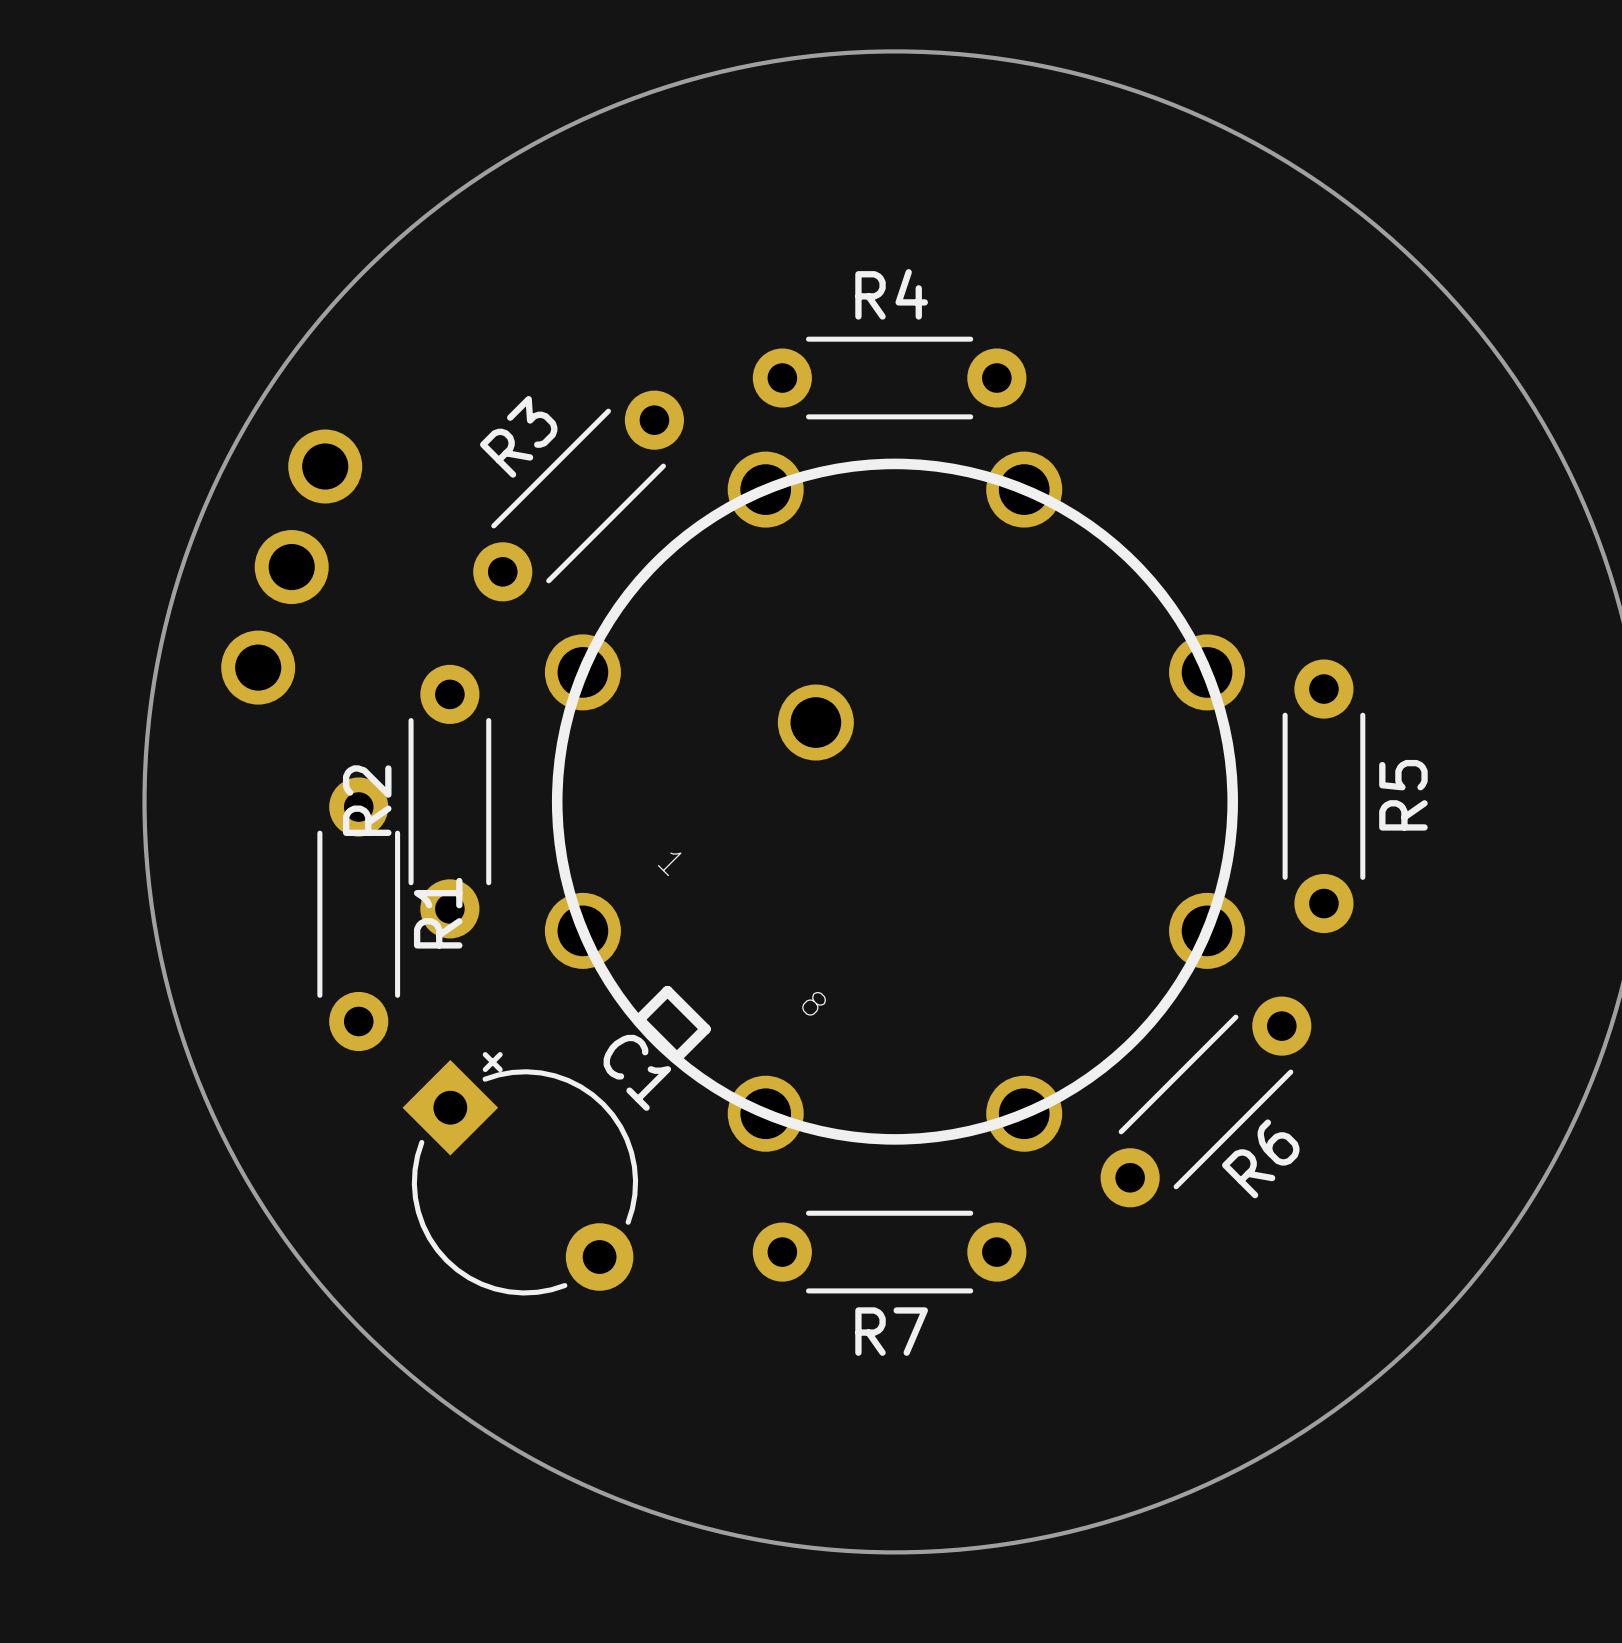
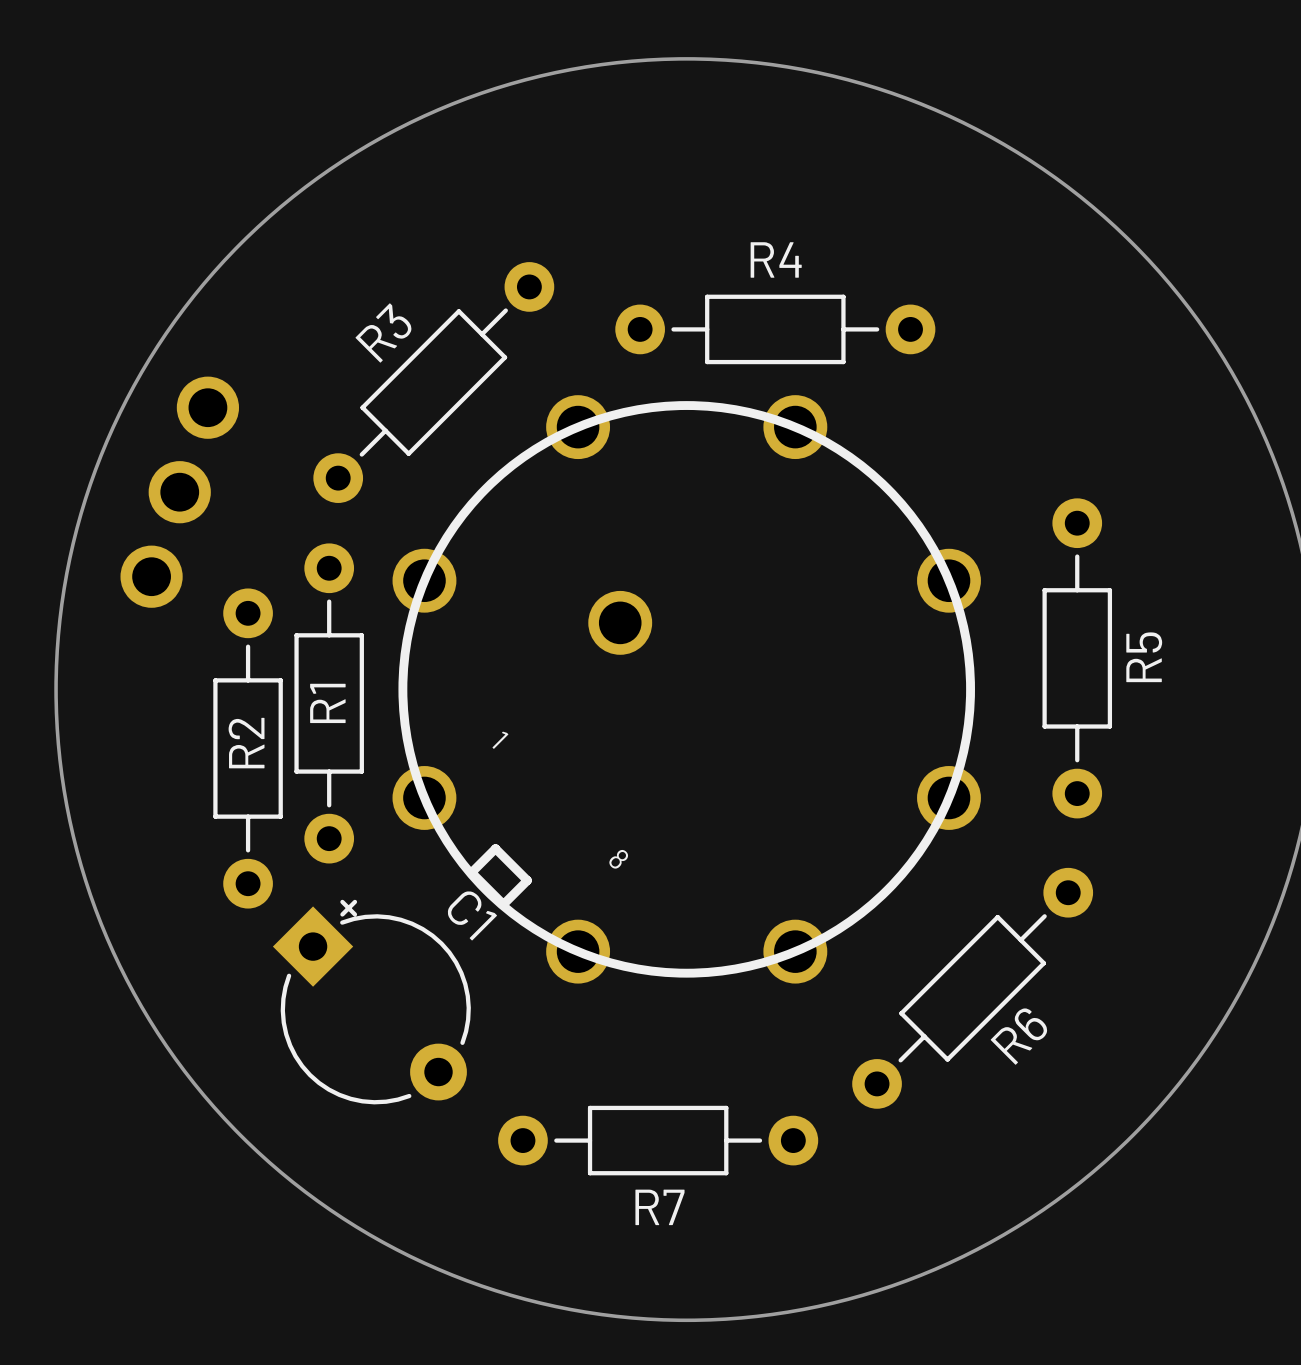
R4 footprint: [752, 336, 1027, 420] -> [615, 294, 936, 365]
R3 footprint: [473, 390, 684, 602] -> [313, 262, 555, 503]
R5 footprint: [1282, 659, 1366, 934] -> [1042, 498, 1113, 819]
R2 footprint: [408, 664, 492, 939] -> [294, 543, 364, 864]
R1 footprint: [317, 777, 401, 1052] -> [213, 588, 283, 909]
R6 footprint: [1100, 996, 1312, 1208] -> [852, 867, 1094, 1109]
R7 footprint: [752, 1210, 1027, 1294] -> [498, 1105, 819, 1176]

